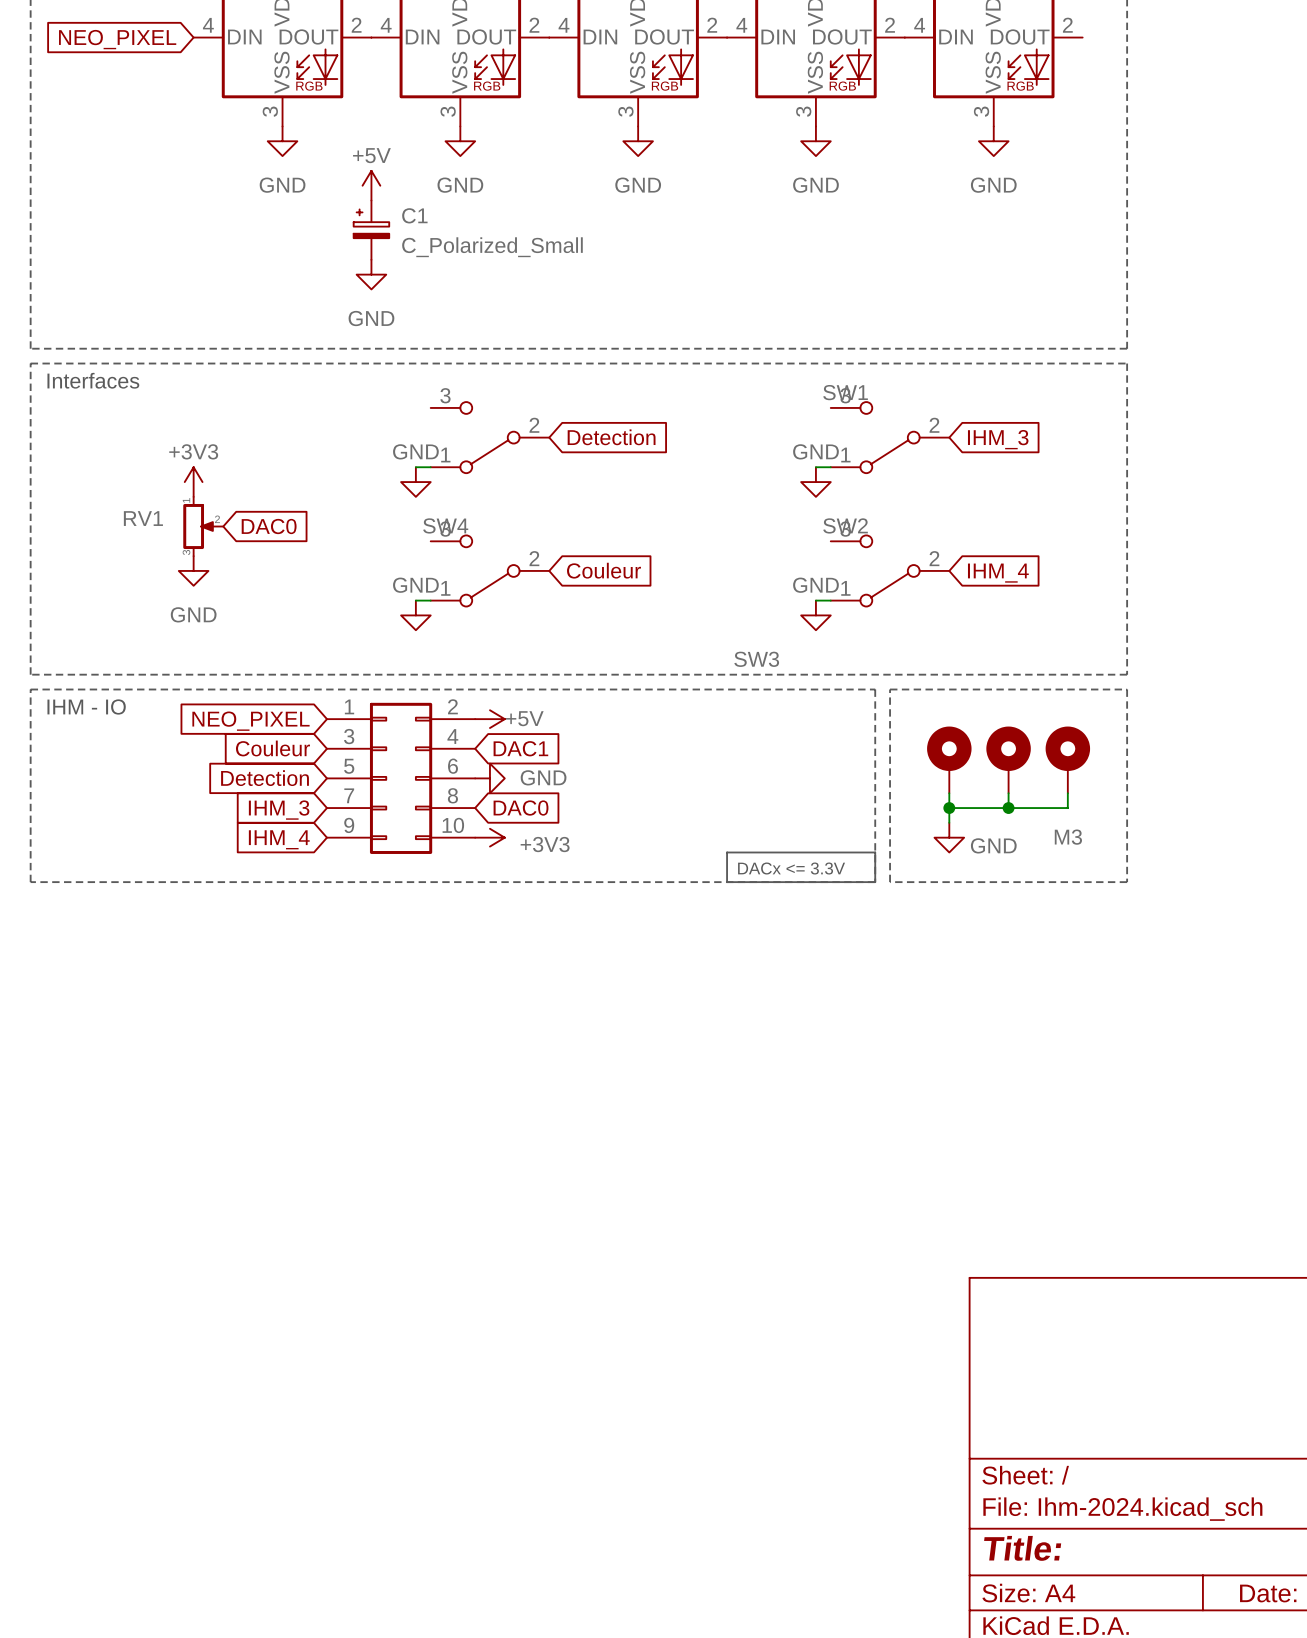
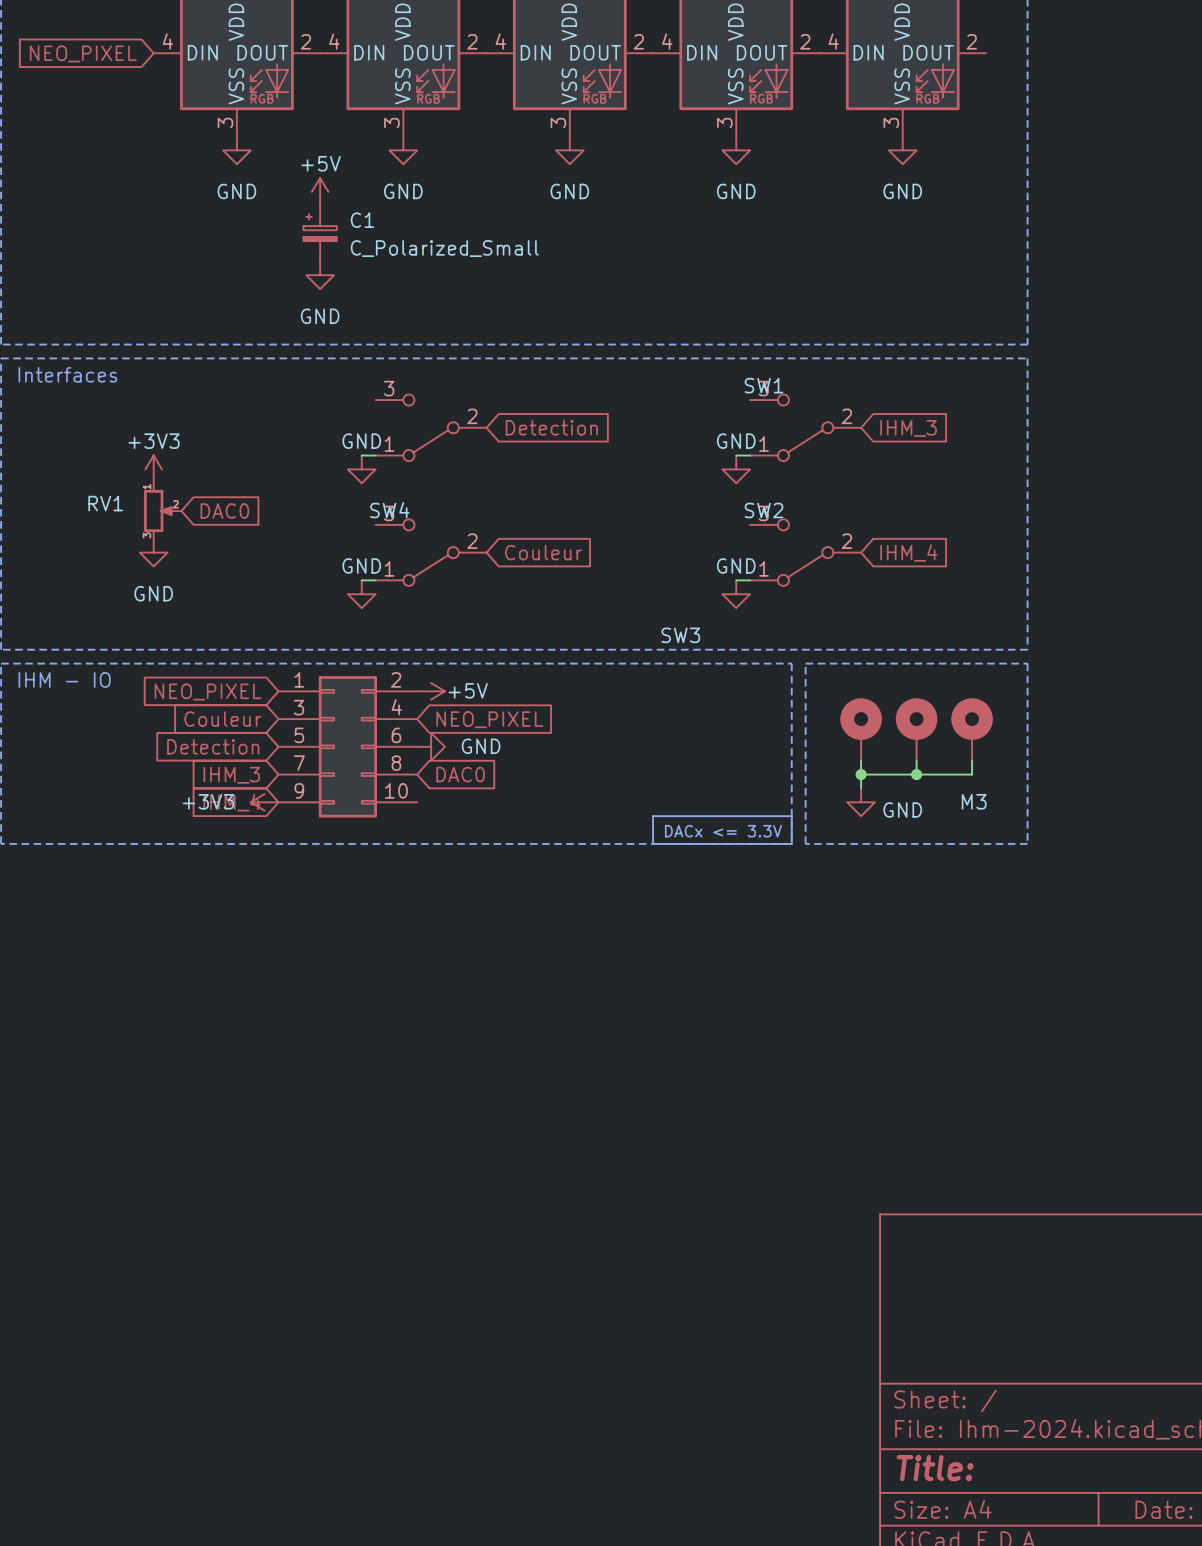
global label: DAC1 (520, 748) -> NEO_PIXEL (489, 719)
power symbol rotation: 0° (489, 837) -> 180° (264, 802)
power symbol position: +3V3 (489, 837) -> +3V3 (264, 802)

